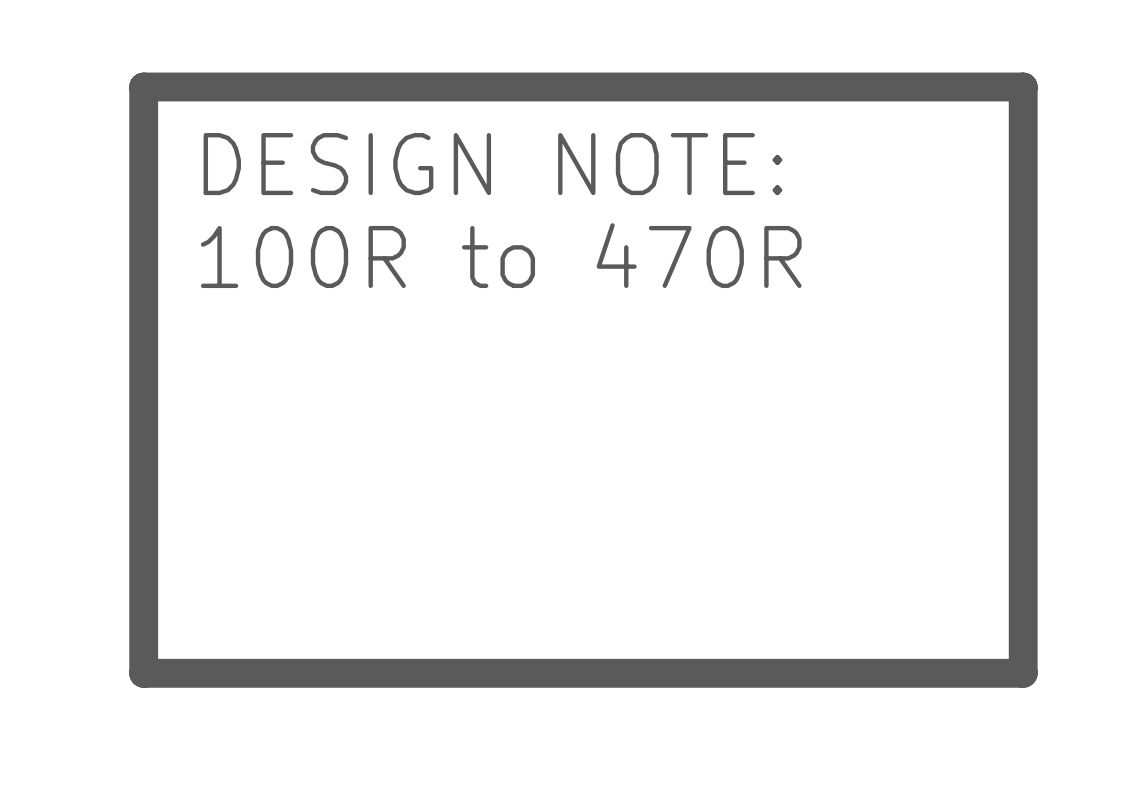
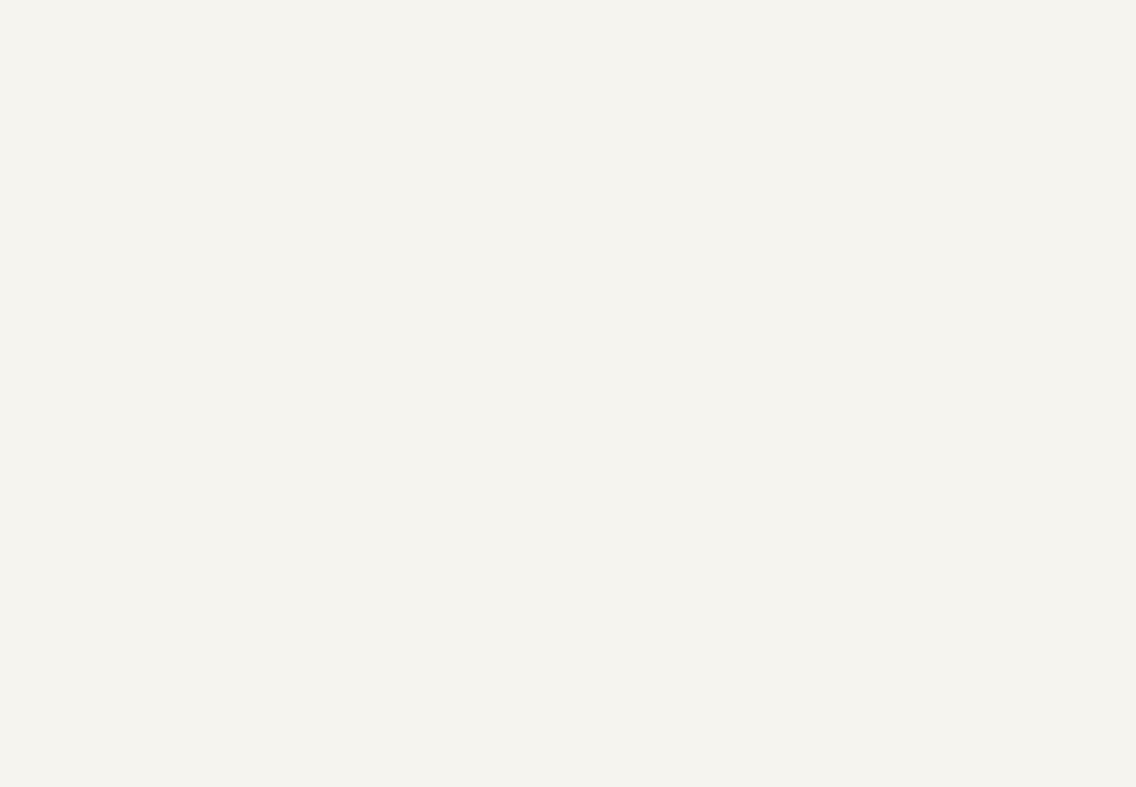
line: (143, 86) (1023, 86) (1023, 673) (143, 673) (143, 86) -> none
text: DESIGN NOTE: (492, 164) -> none
text: 100R to 470R (501, 255) -> none

